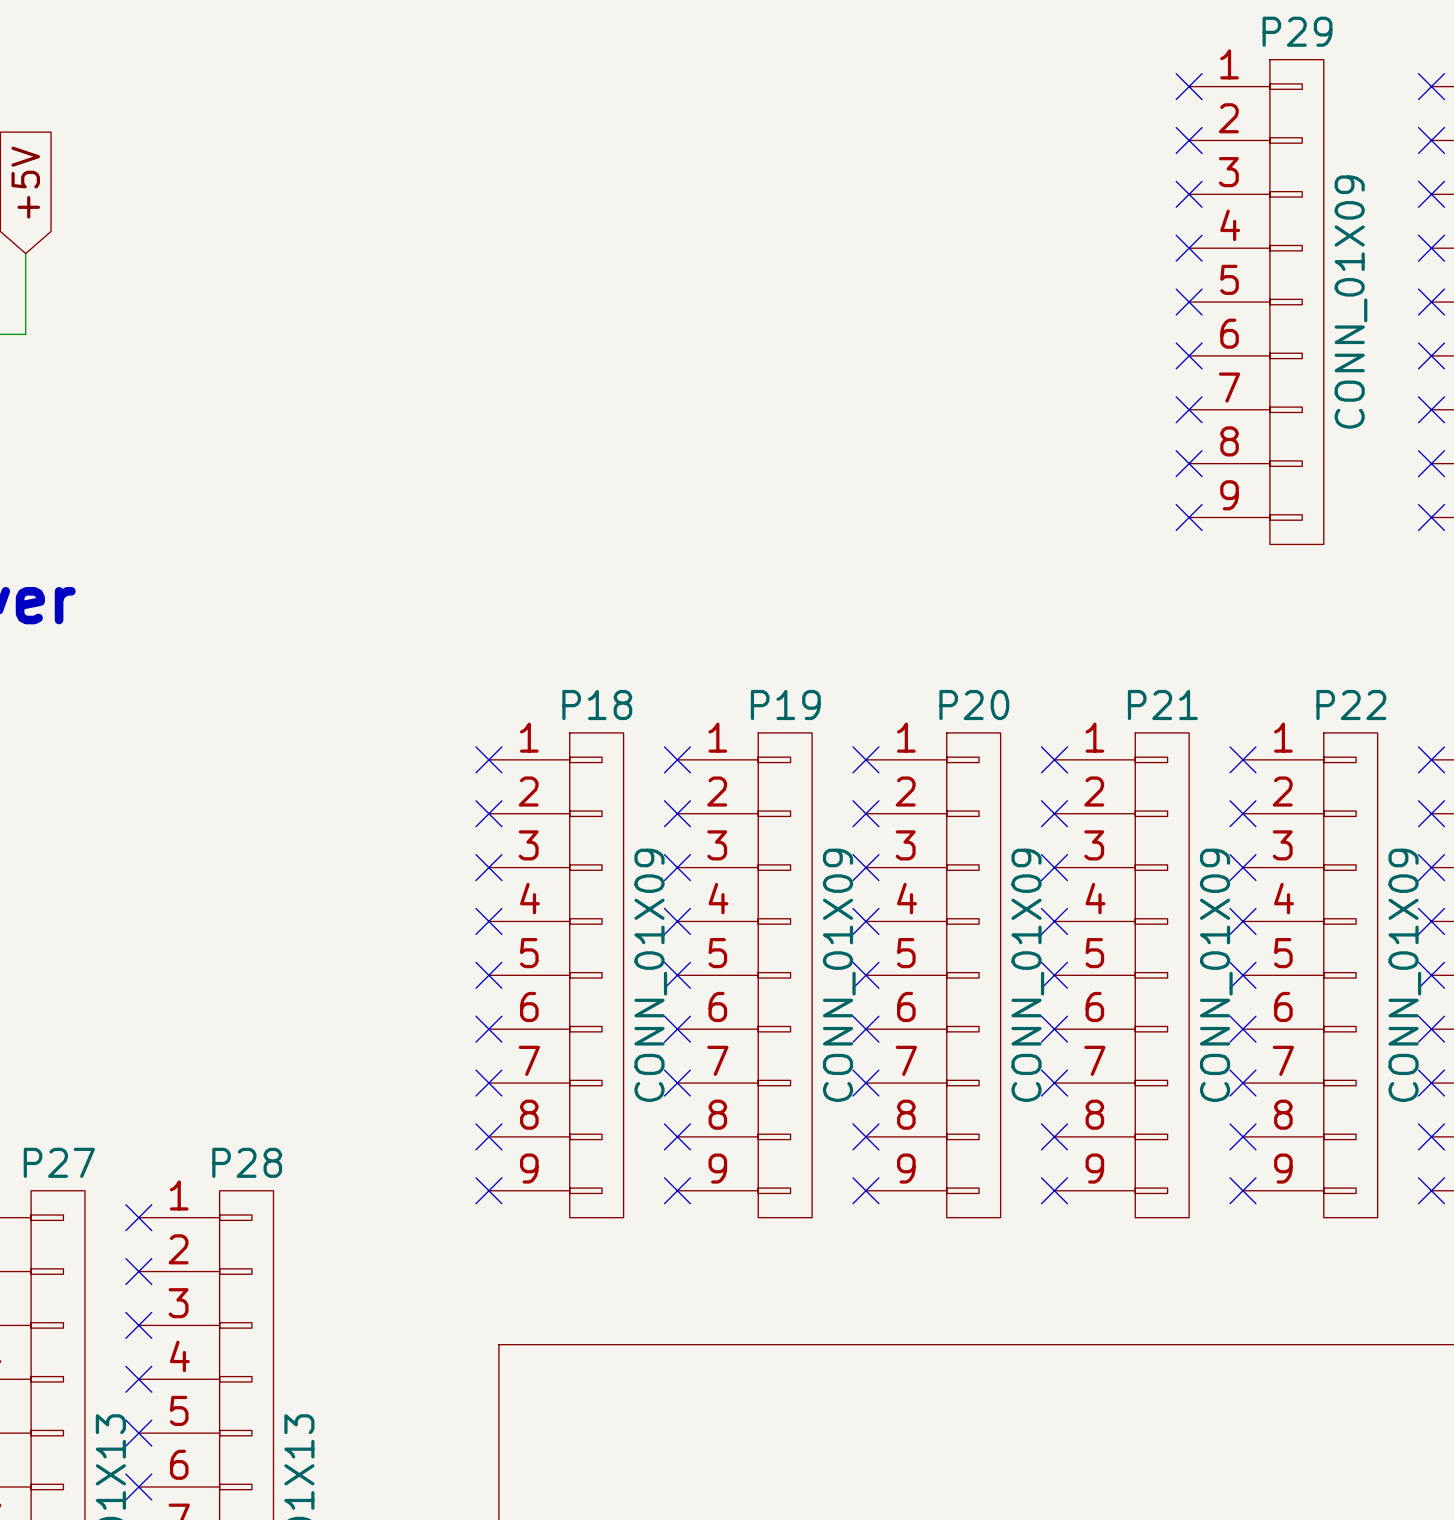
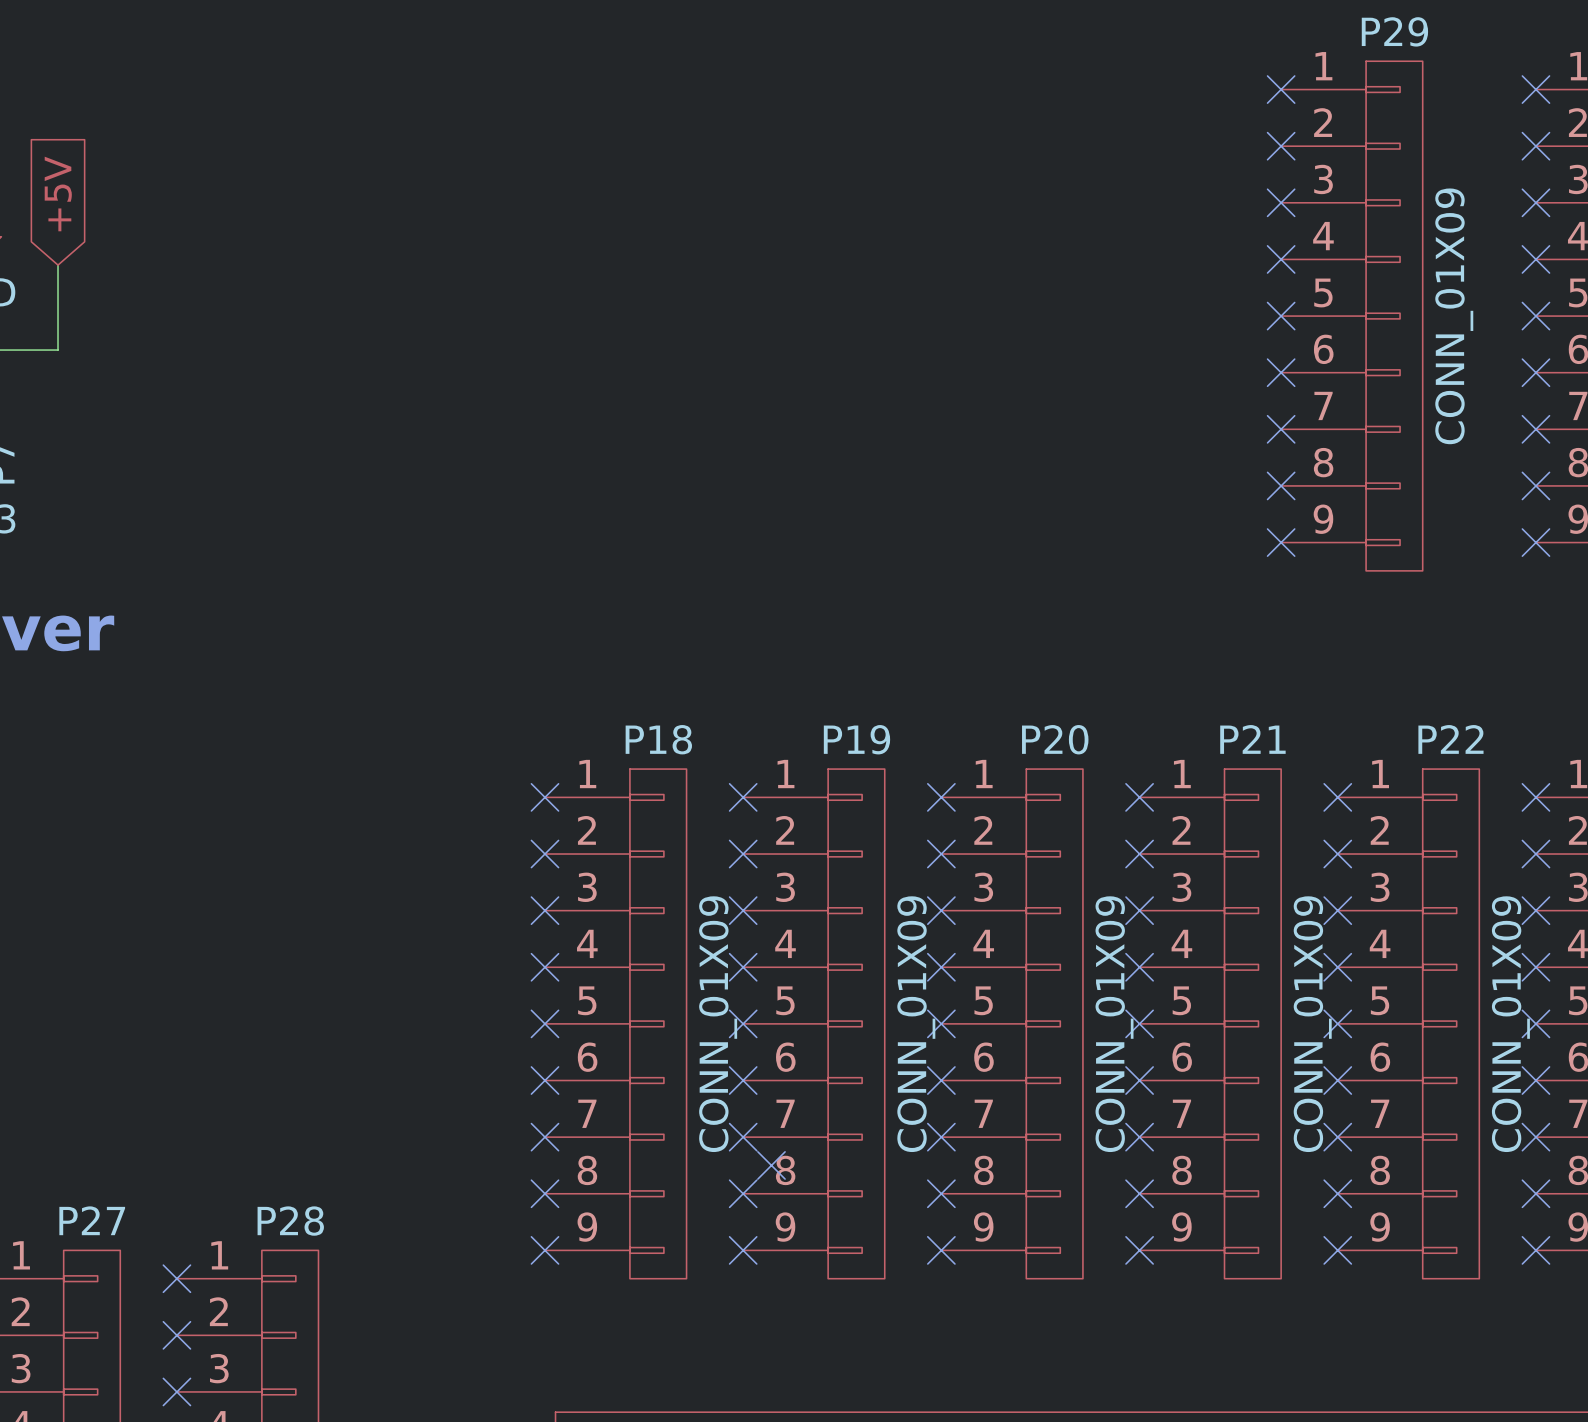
no-connect mark: none -> (771, 1165)

